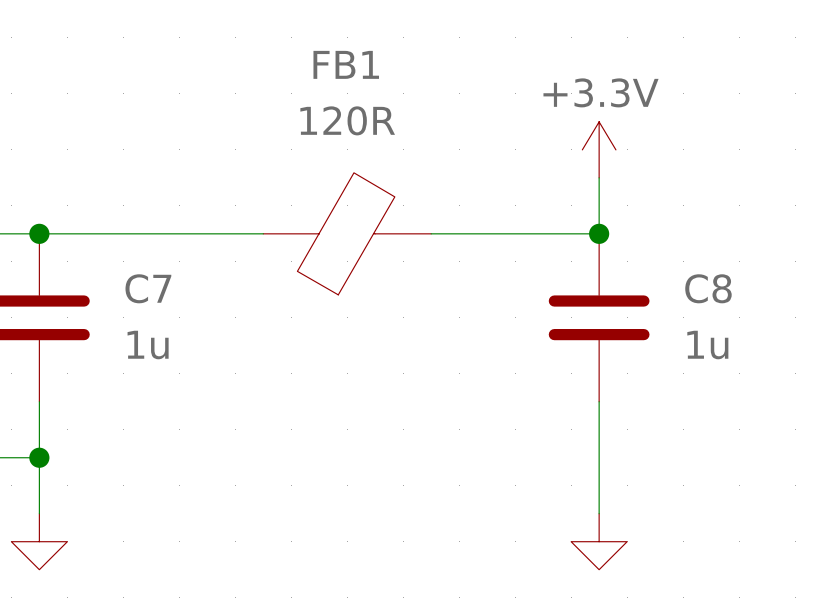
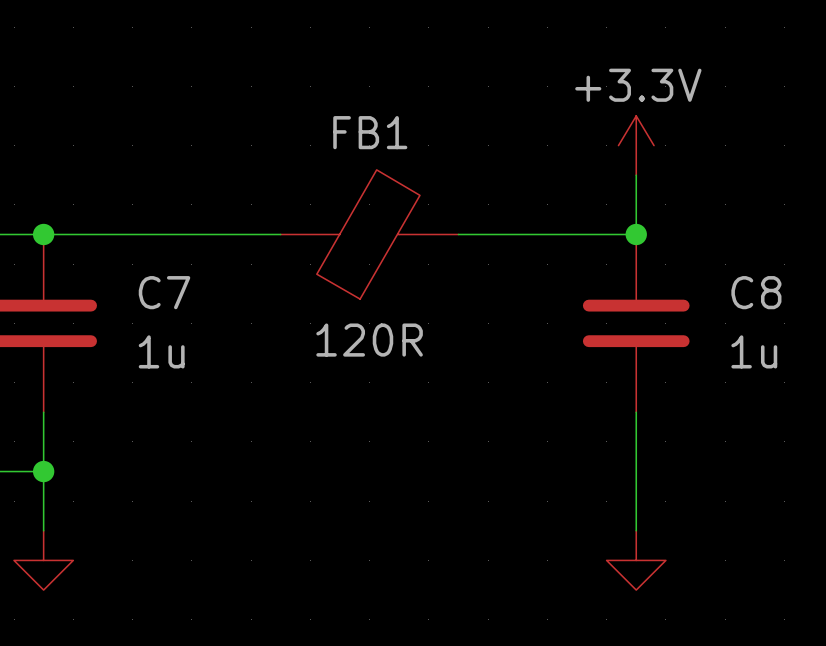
FB1 name position: FB1 (346, 64) -> FB1 (370, 132)
FB1 value position: 120R (347, 120) -> 120R (369, 340)

